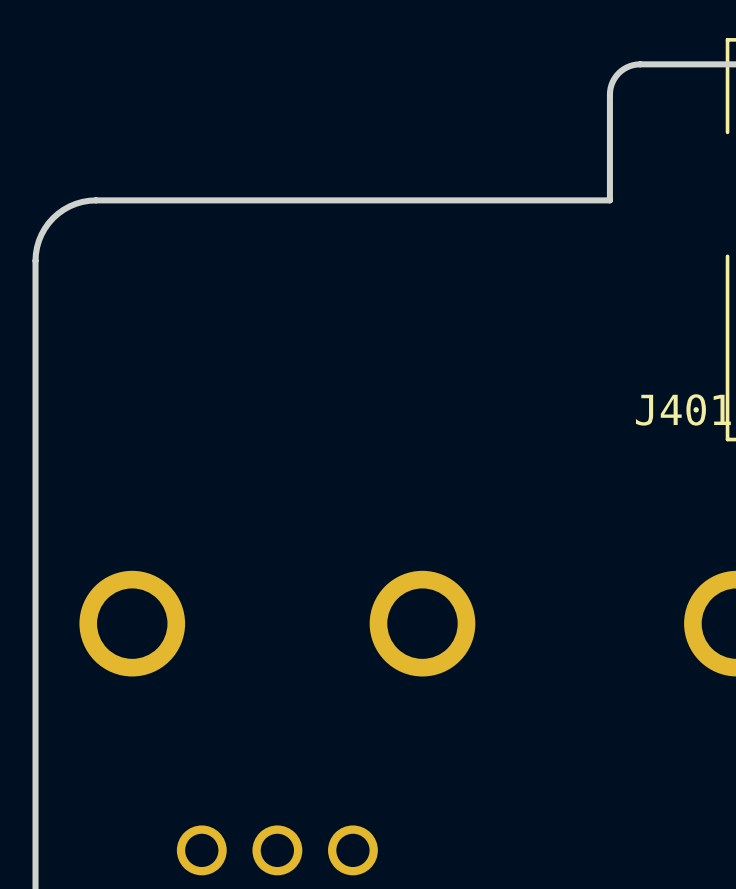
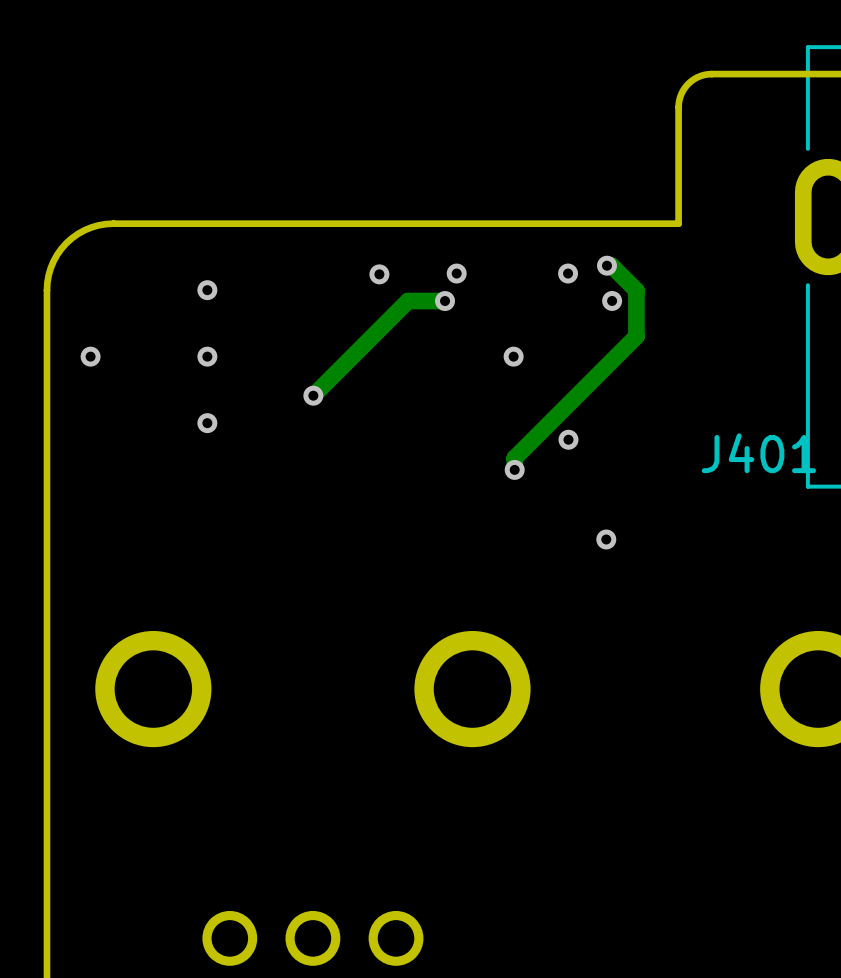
track: none -> (606, 265) (611, 265) (636, 290) (636, 336) (514, 458) (514, 469)
via: none -> (606, 265)
via: none -> (456, 273)
via: none -> (568, 273)
via: none -> (379, 274)
via: none -> (207, 290)
track: none -> (445, 301) (407, 301) (313, 395)
via: none -> (445, 301)
via: none -> (612, 300)
via: none -> (90, 356)
via: none -> (207, 356)
via: none -> (513, 356)
via: none -> (313, 395)
via: none -> (207, 423)
via: none -> (568, 439)
via: none -> (514, 469)
via: none -> (606, 539)

